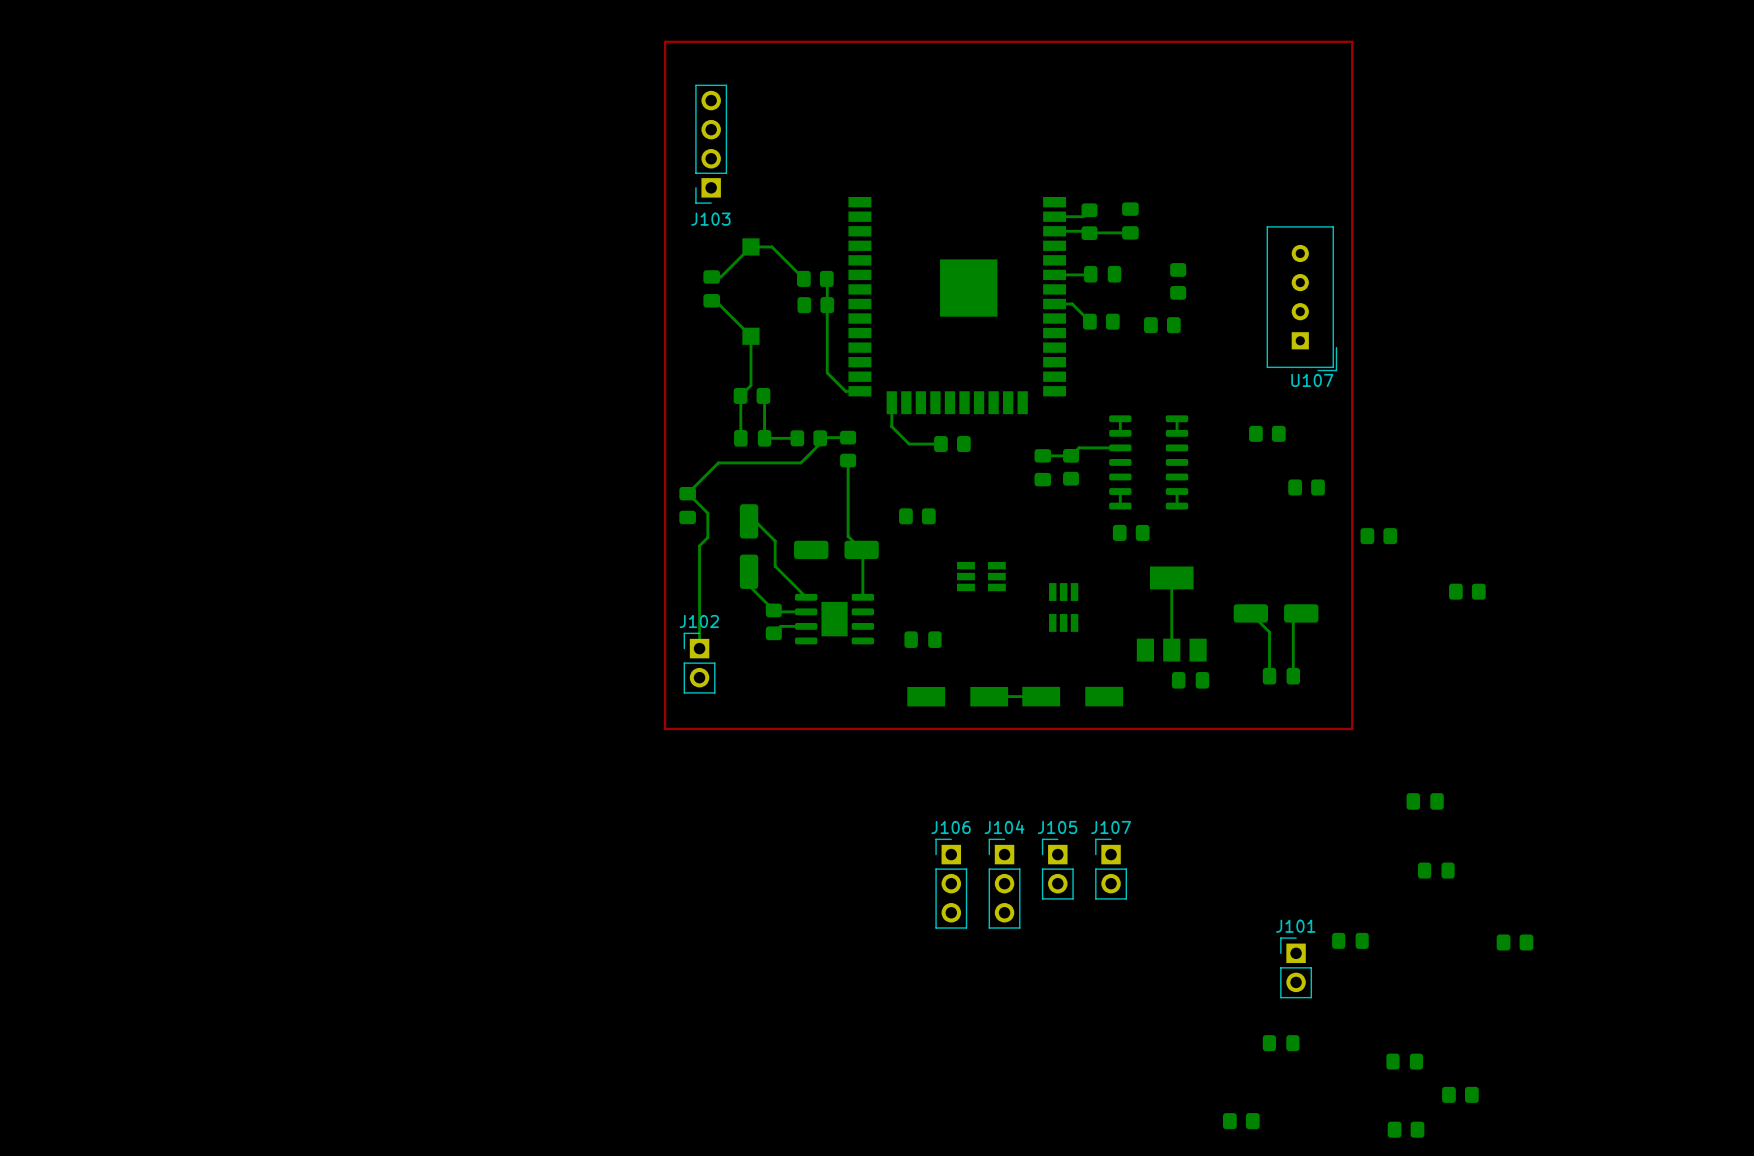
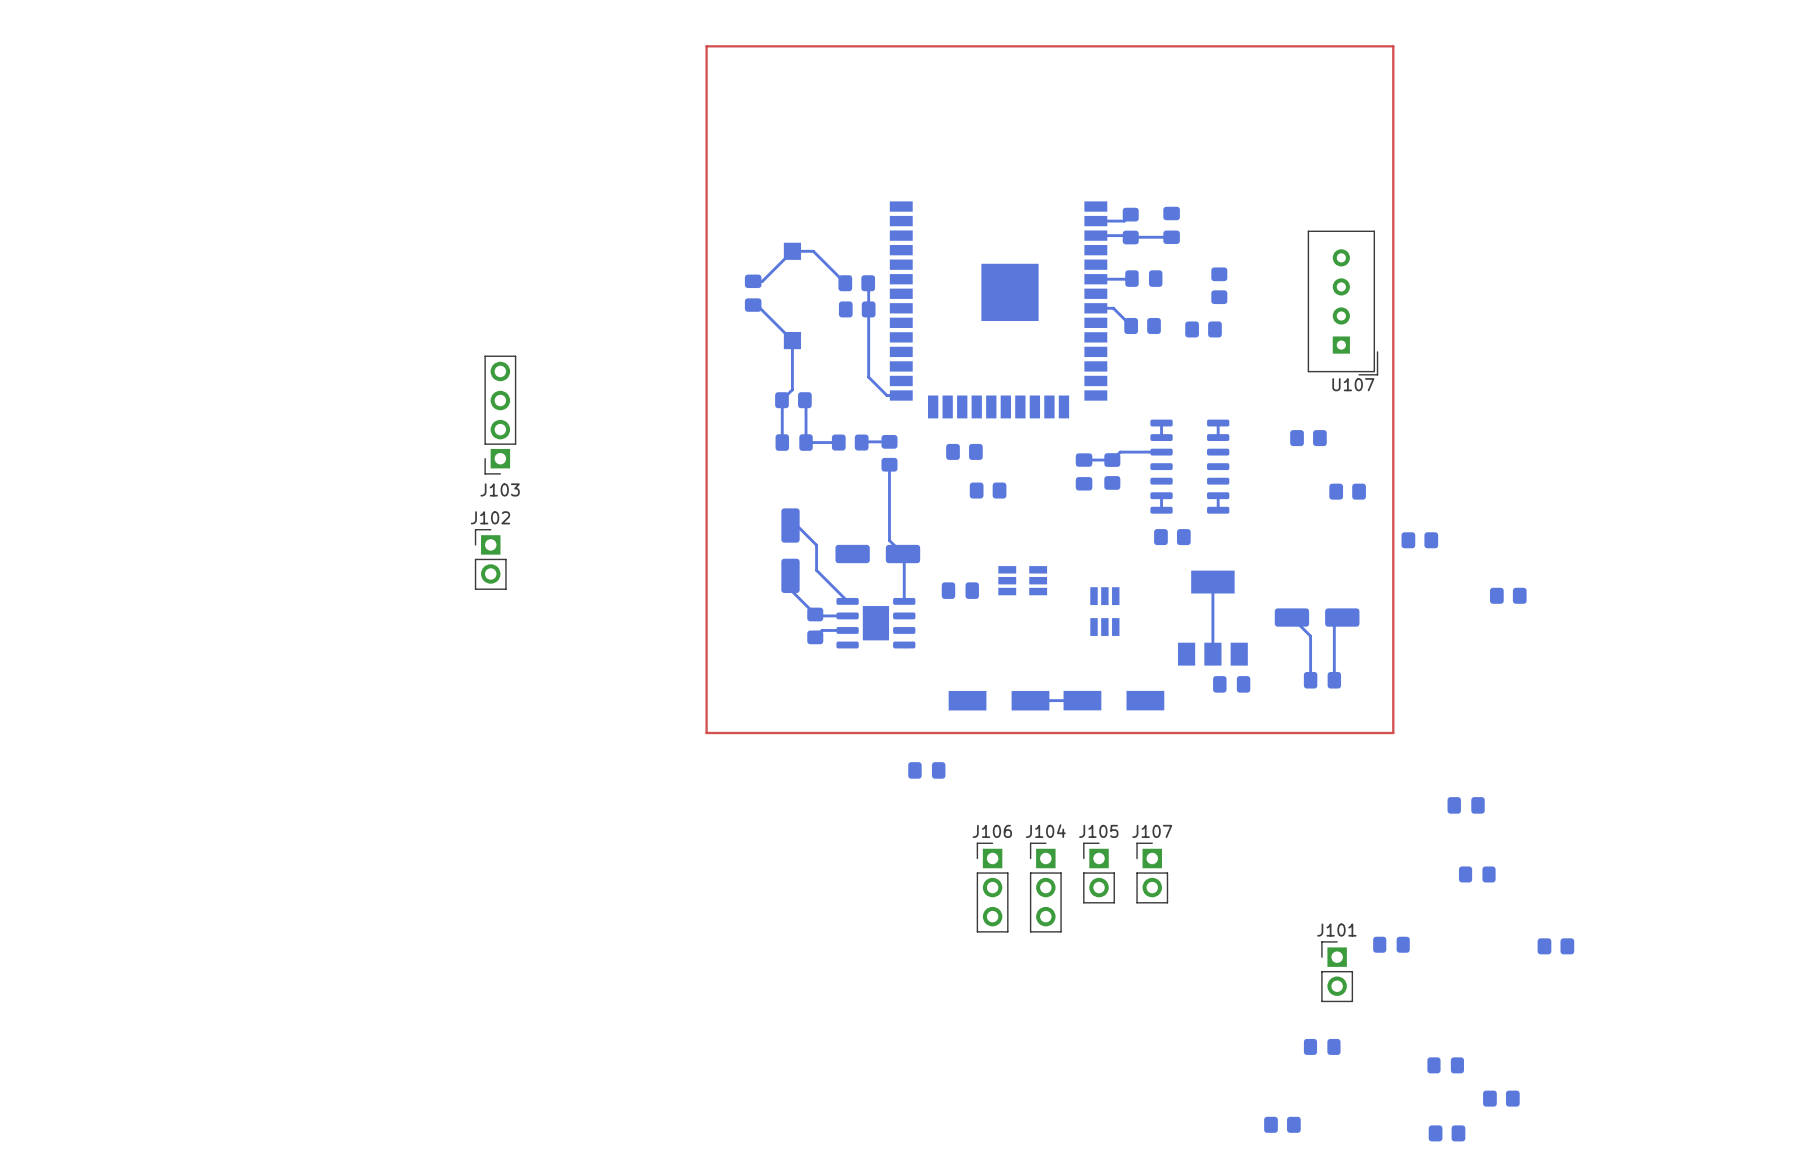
J103 position: (711, 144) -> (500, 415)
bottom track: (891, 402) (891, 426) (909, 444) (940, 444) -> none
bottom track: (820, 438) (820, 443) (800, 462) (718, 462) (687, 493) (707, 513) (707, 537) (699, 545) (699, 648) -> none
part: (952, 444) -> none
part: none -> (964, 451)
part: none -> (988, 490)
part: (687, 505) -> none
part: (917, 516) -> none
part position: (923, 639) -> (960, 590)
J102 position: (699, 663) -> (490, 559)
part: none -> (926, 770)

